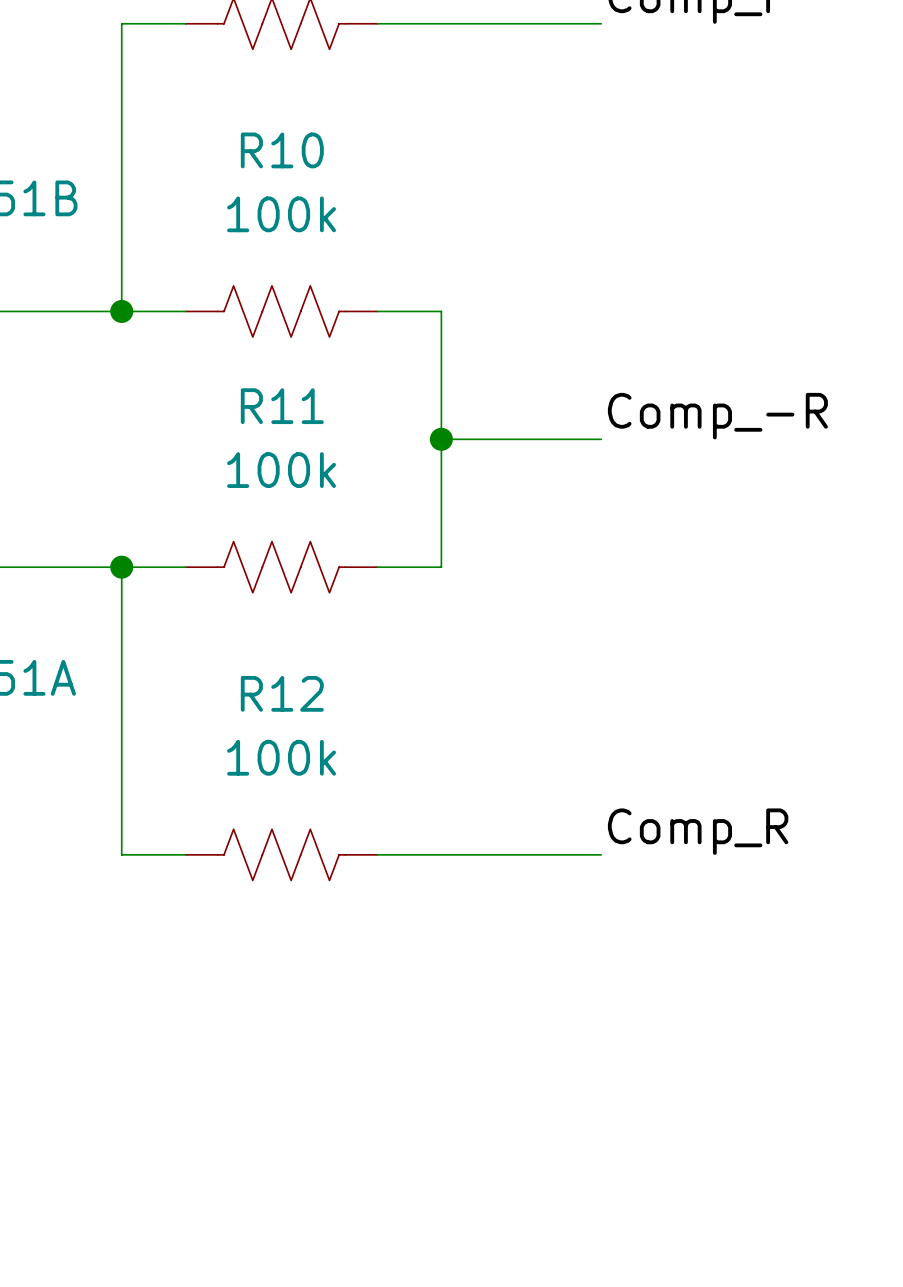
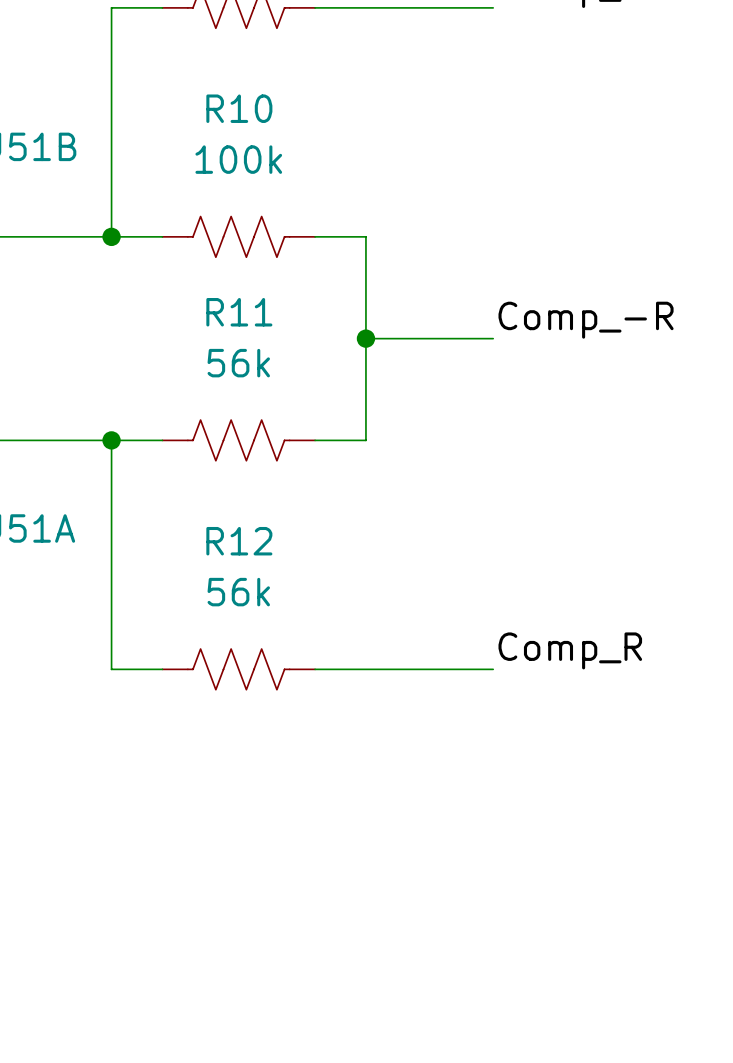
R11 value: 100k (281, 470) -> 56k (238, 363)
R12 value: 100k (281, 757) -> 56k (238, 592)

